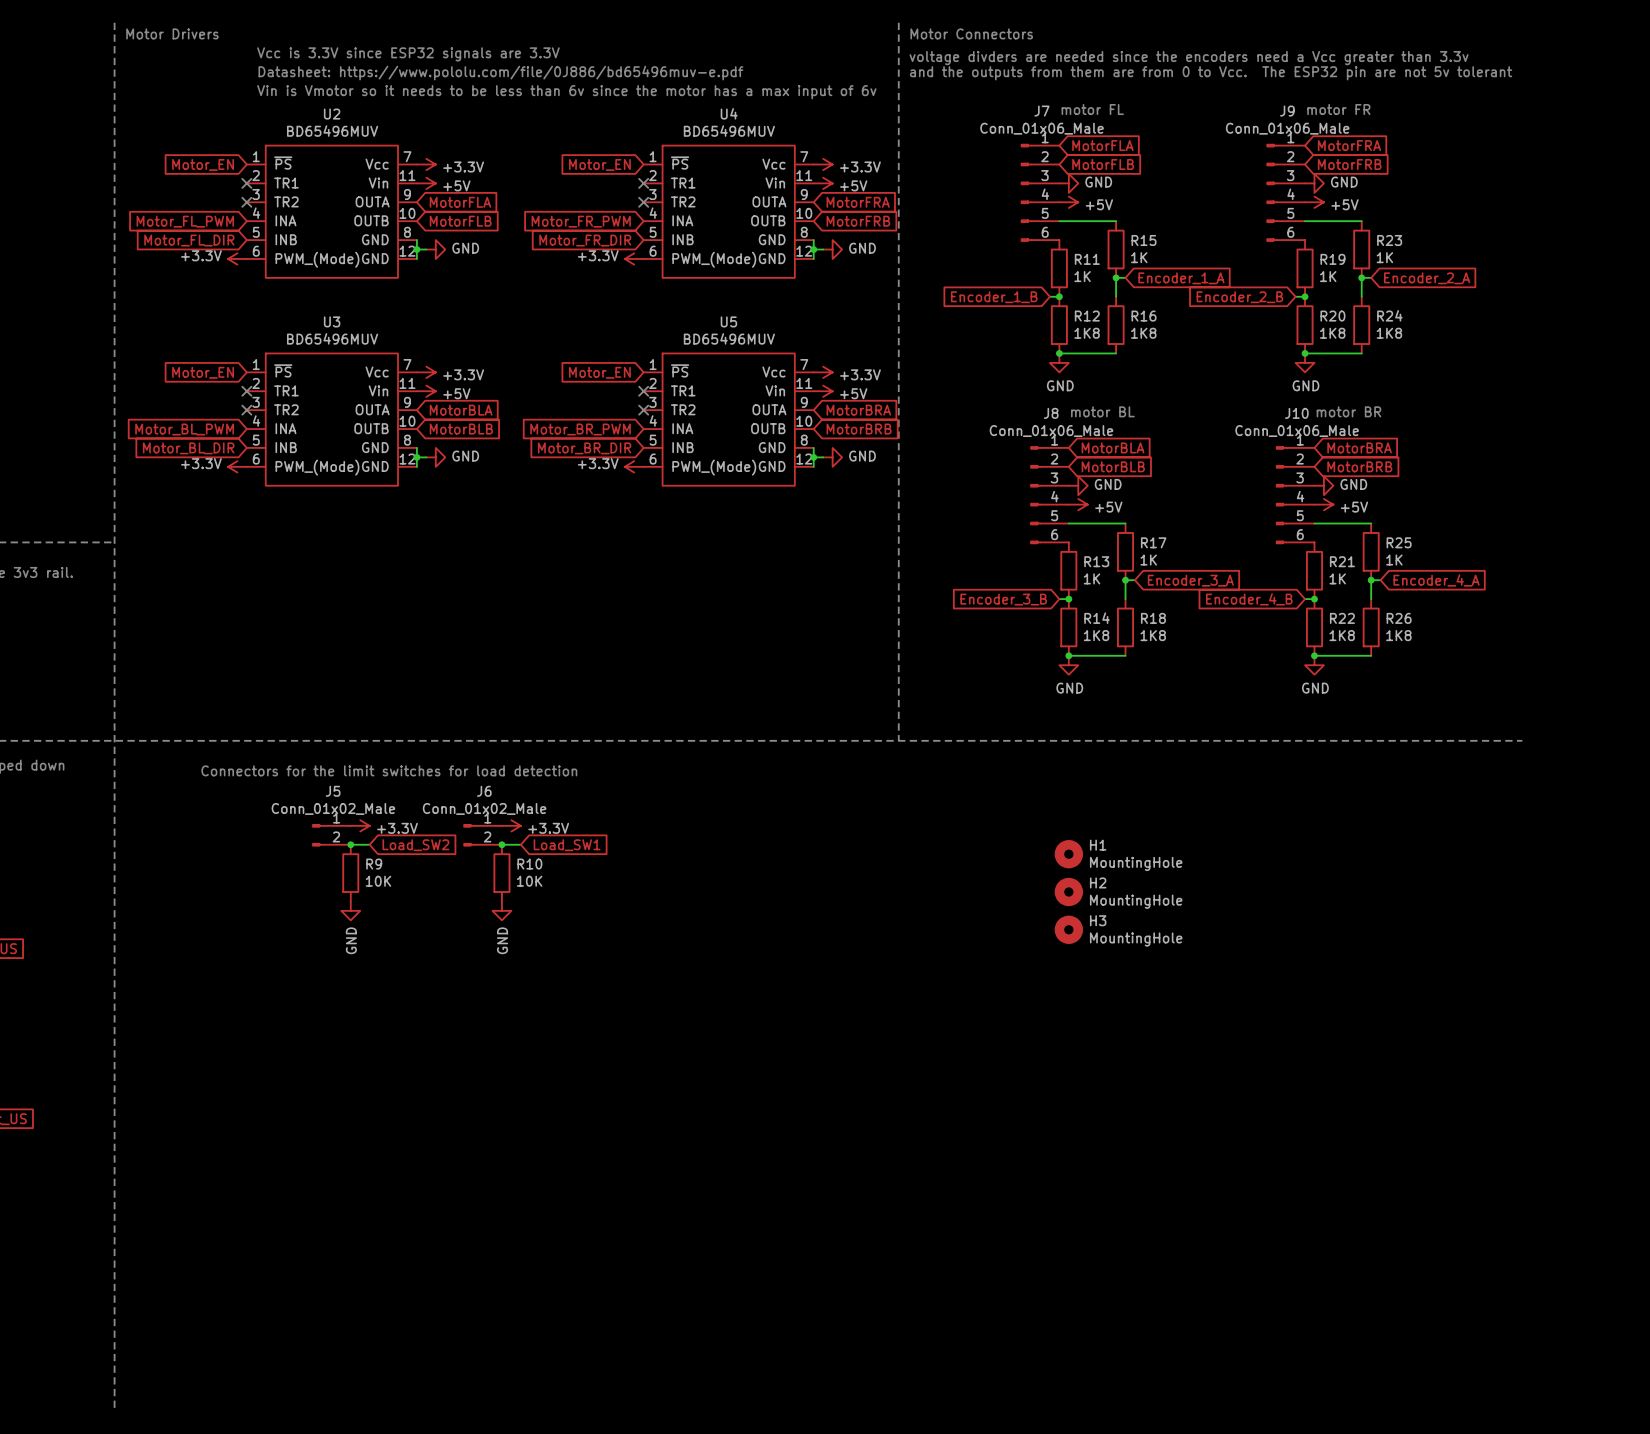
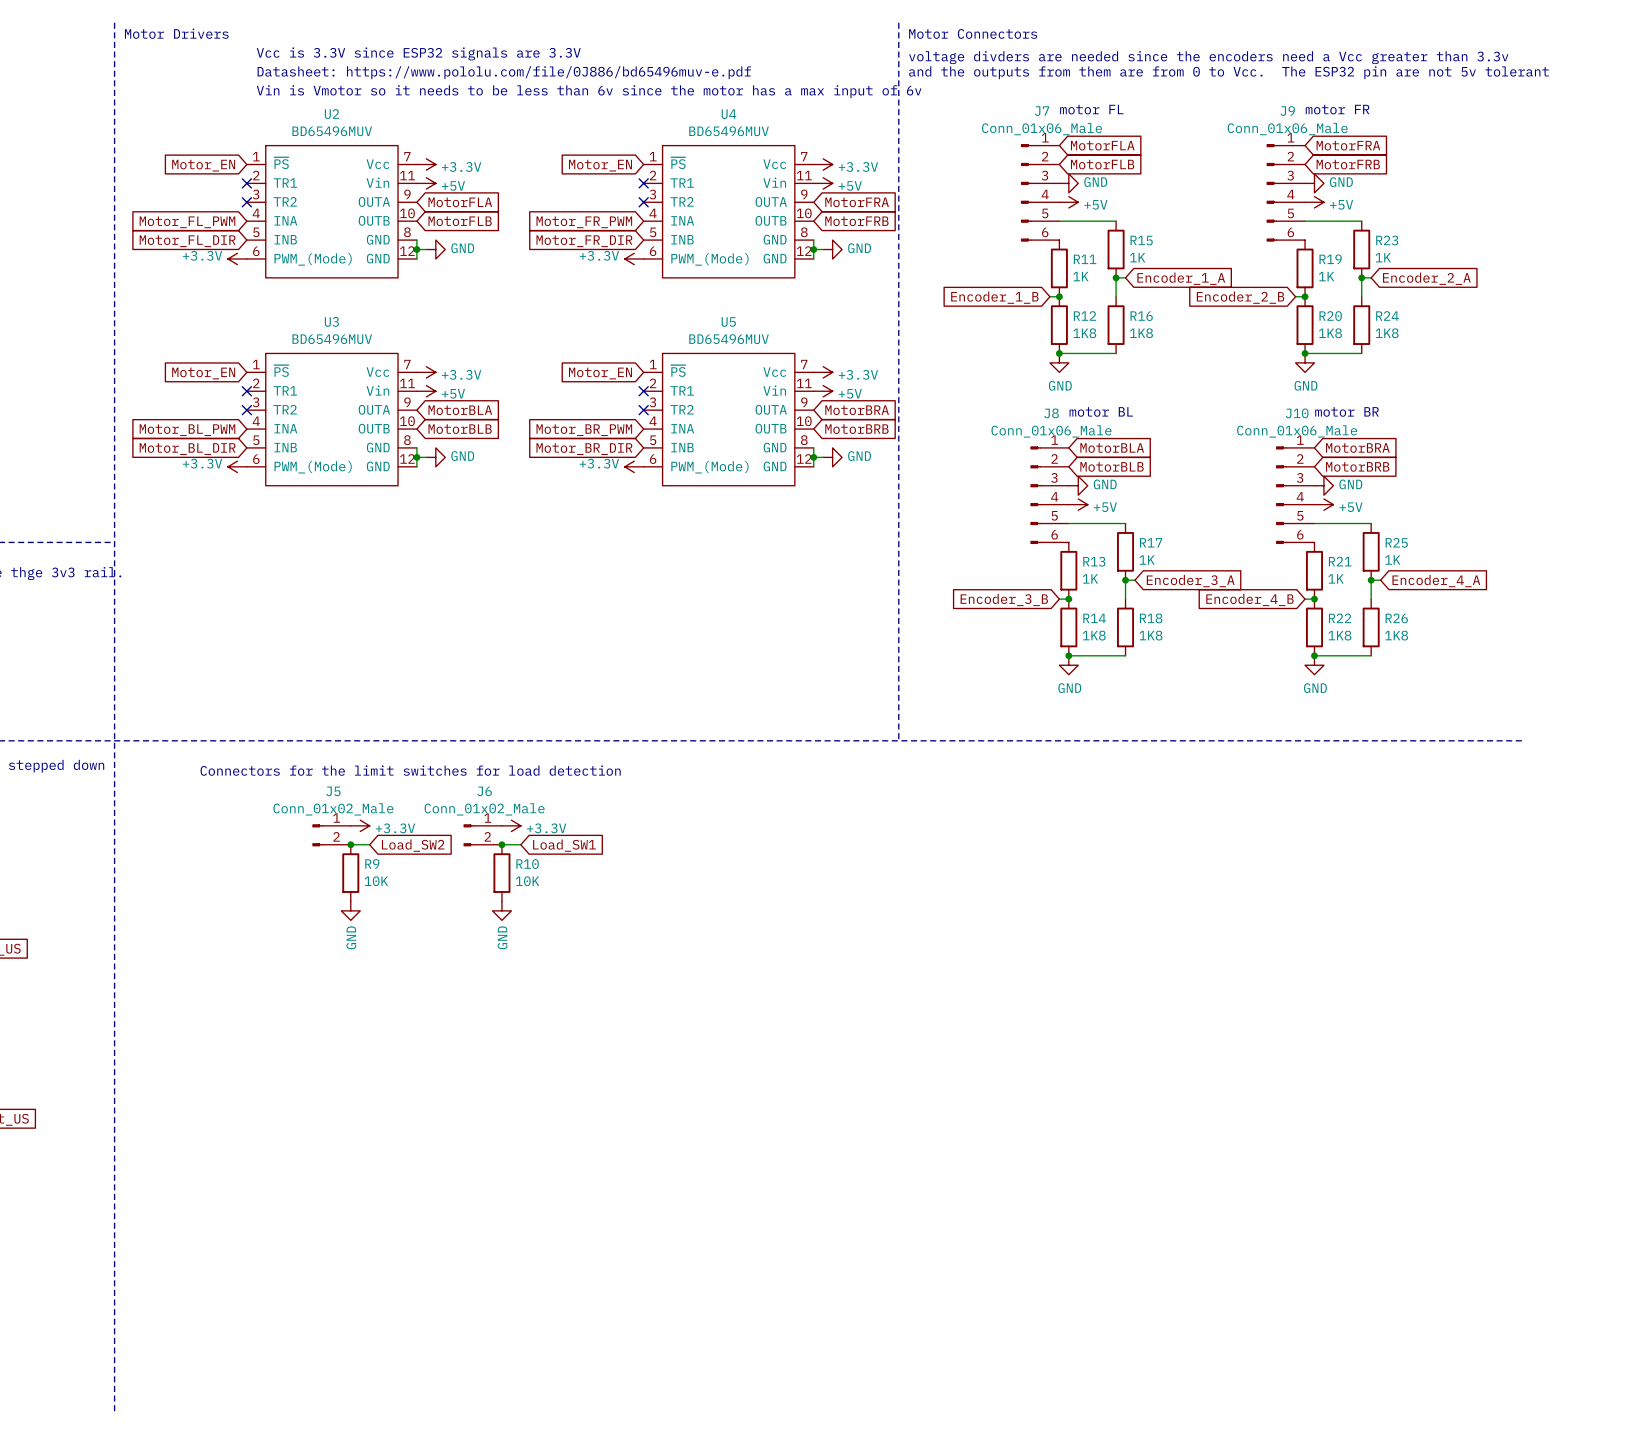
H1: MountingHole (1068, 854) -> none
H2: MountingHole (1068, 891) -> none
H3: MountingHole (1068, 929) -> none

